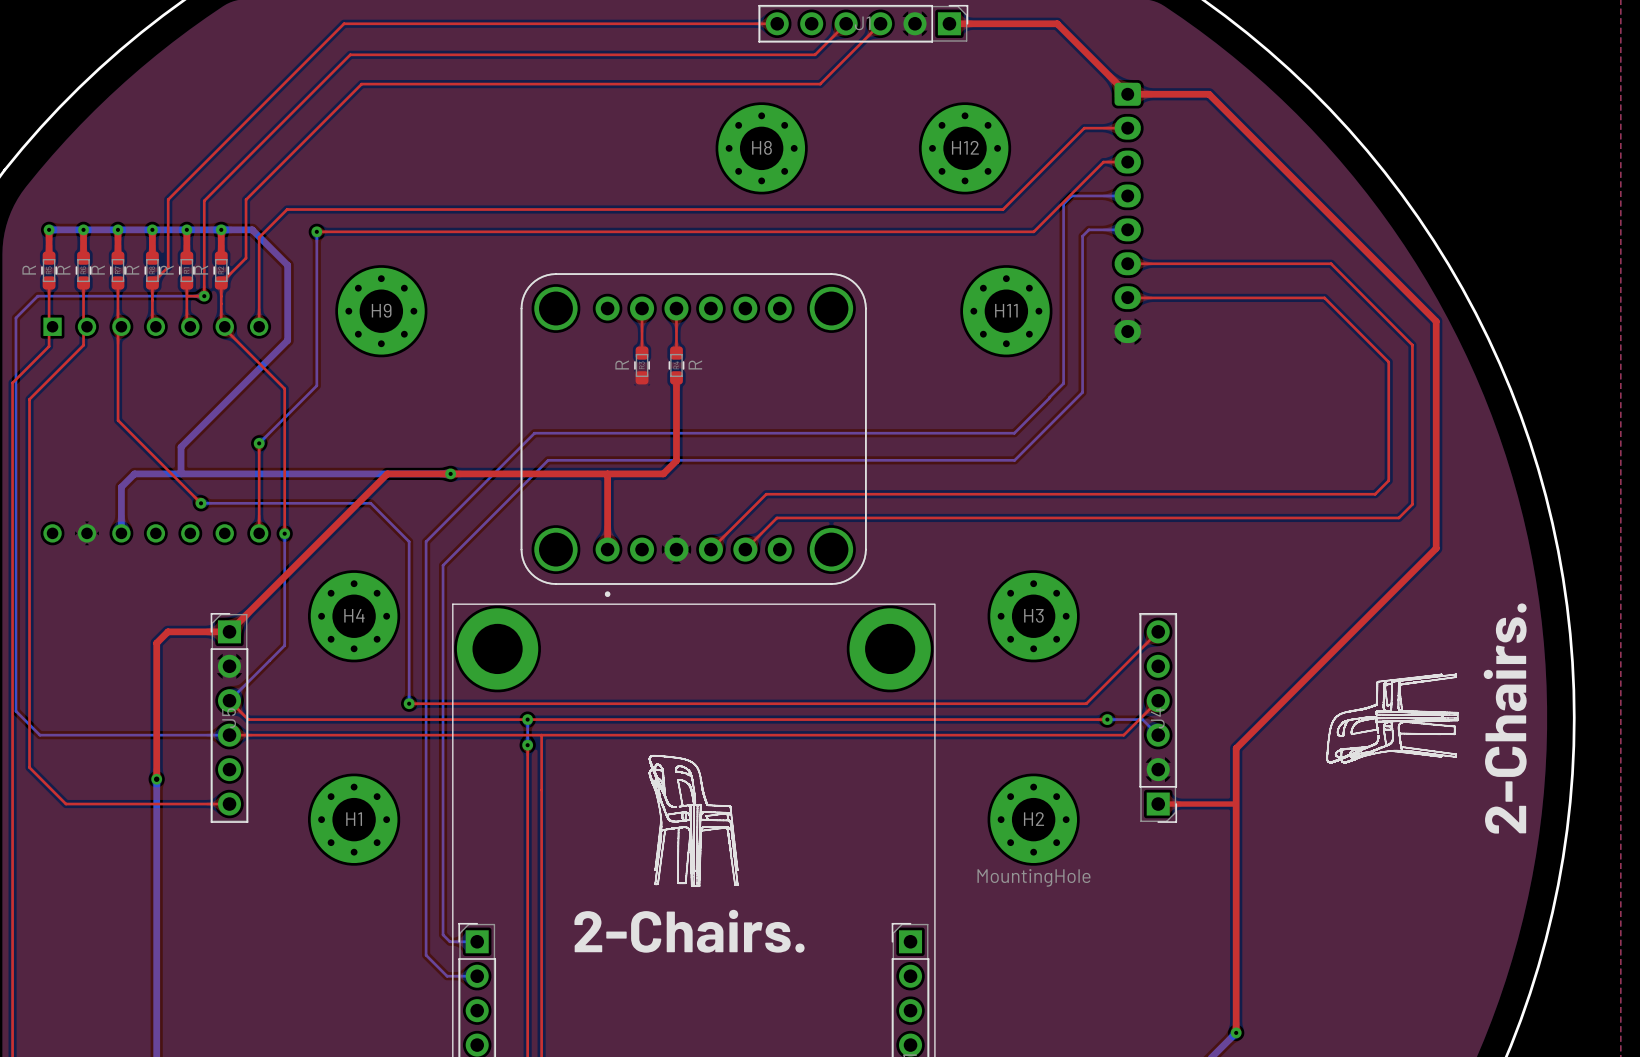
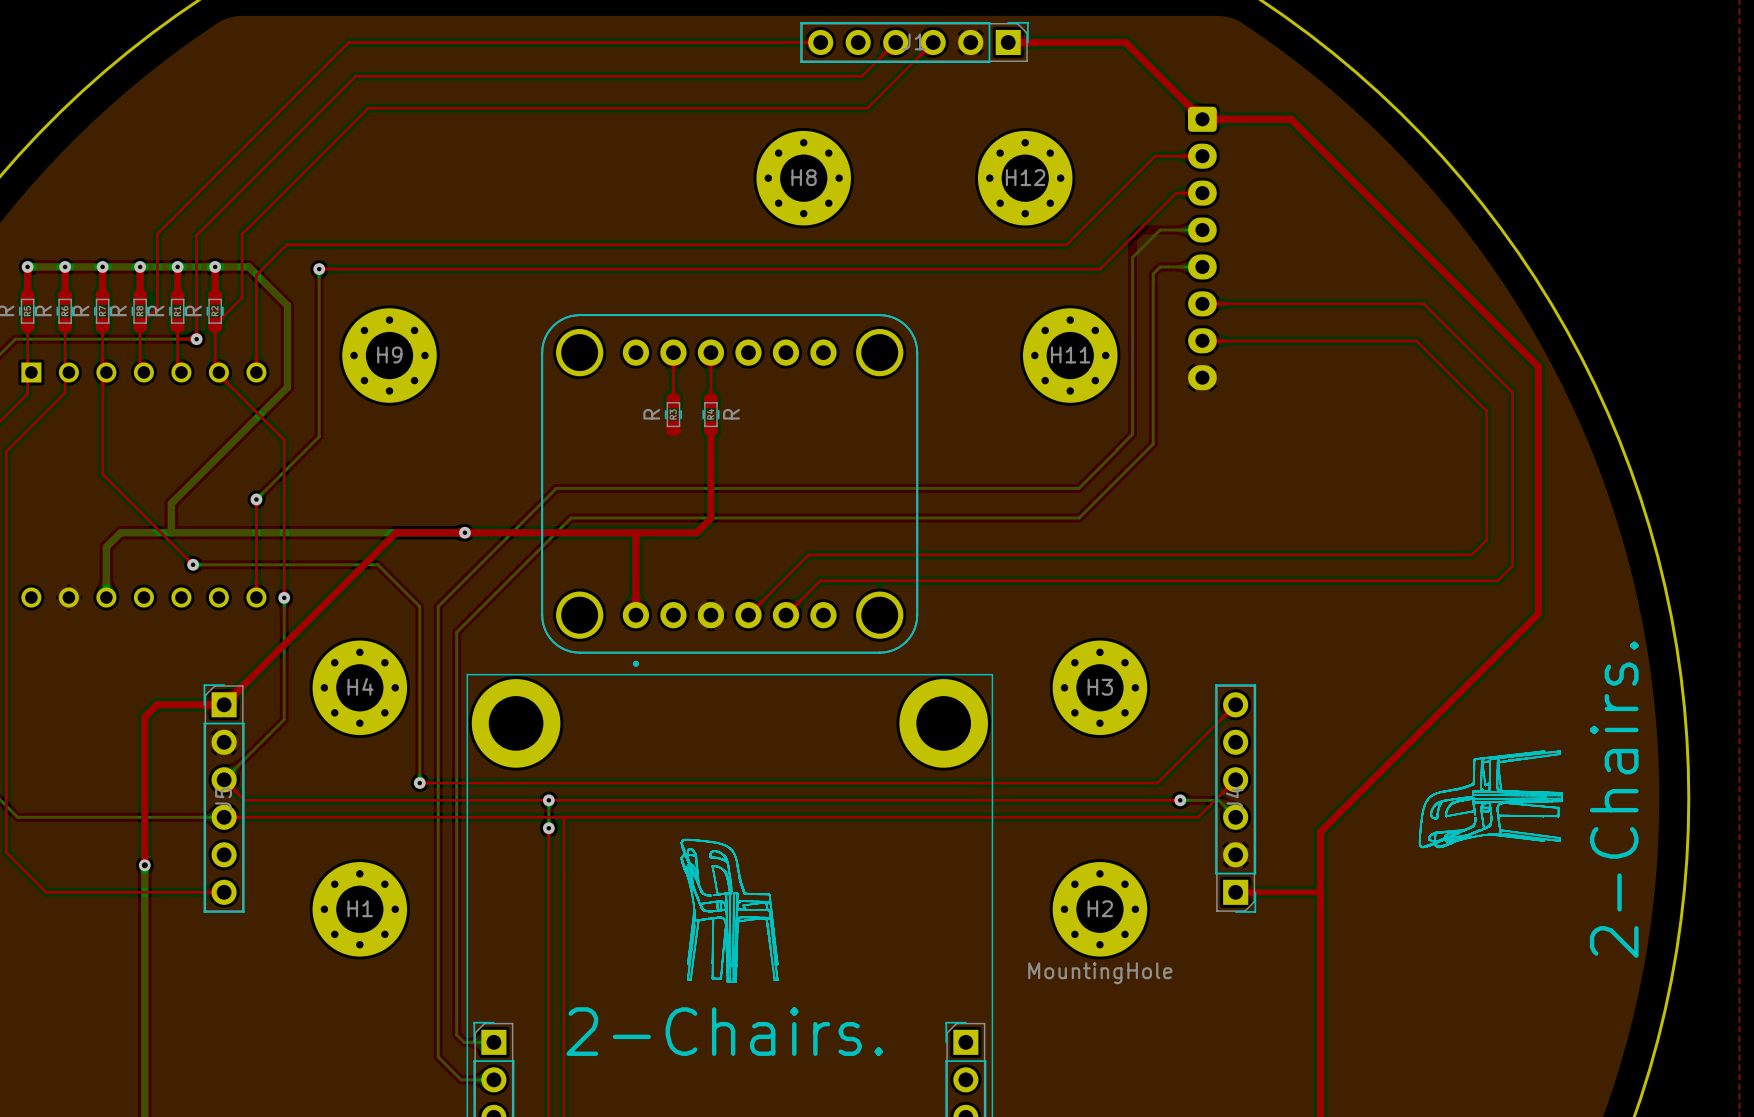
bottom track: (1088, 195) (1071, 195) (1063, 204) (1063, 221) -> (1160, 230) (1132, 257)

